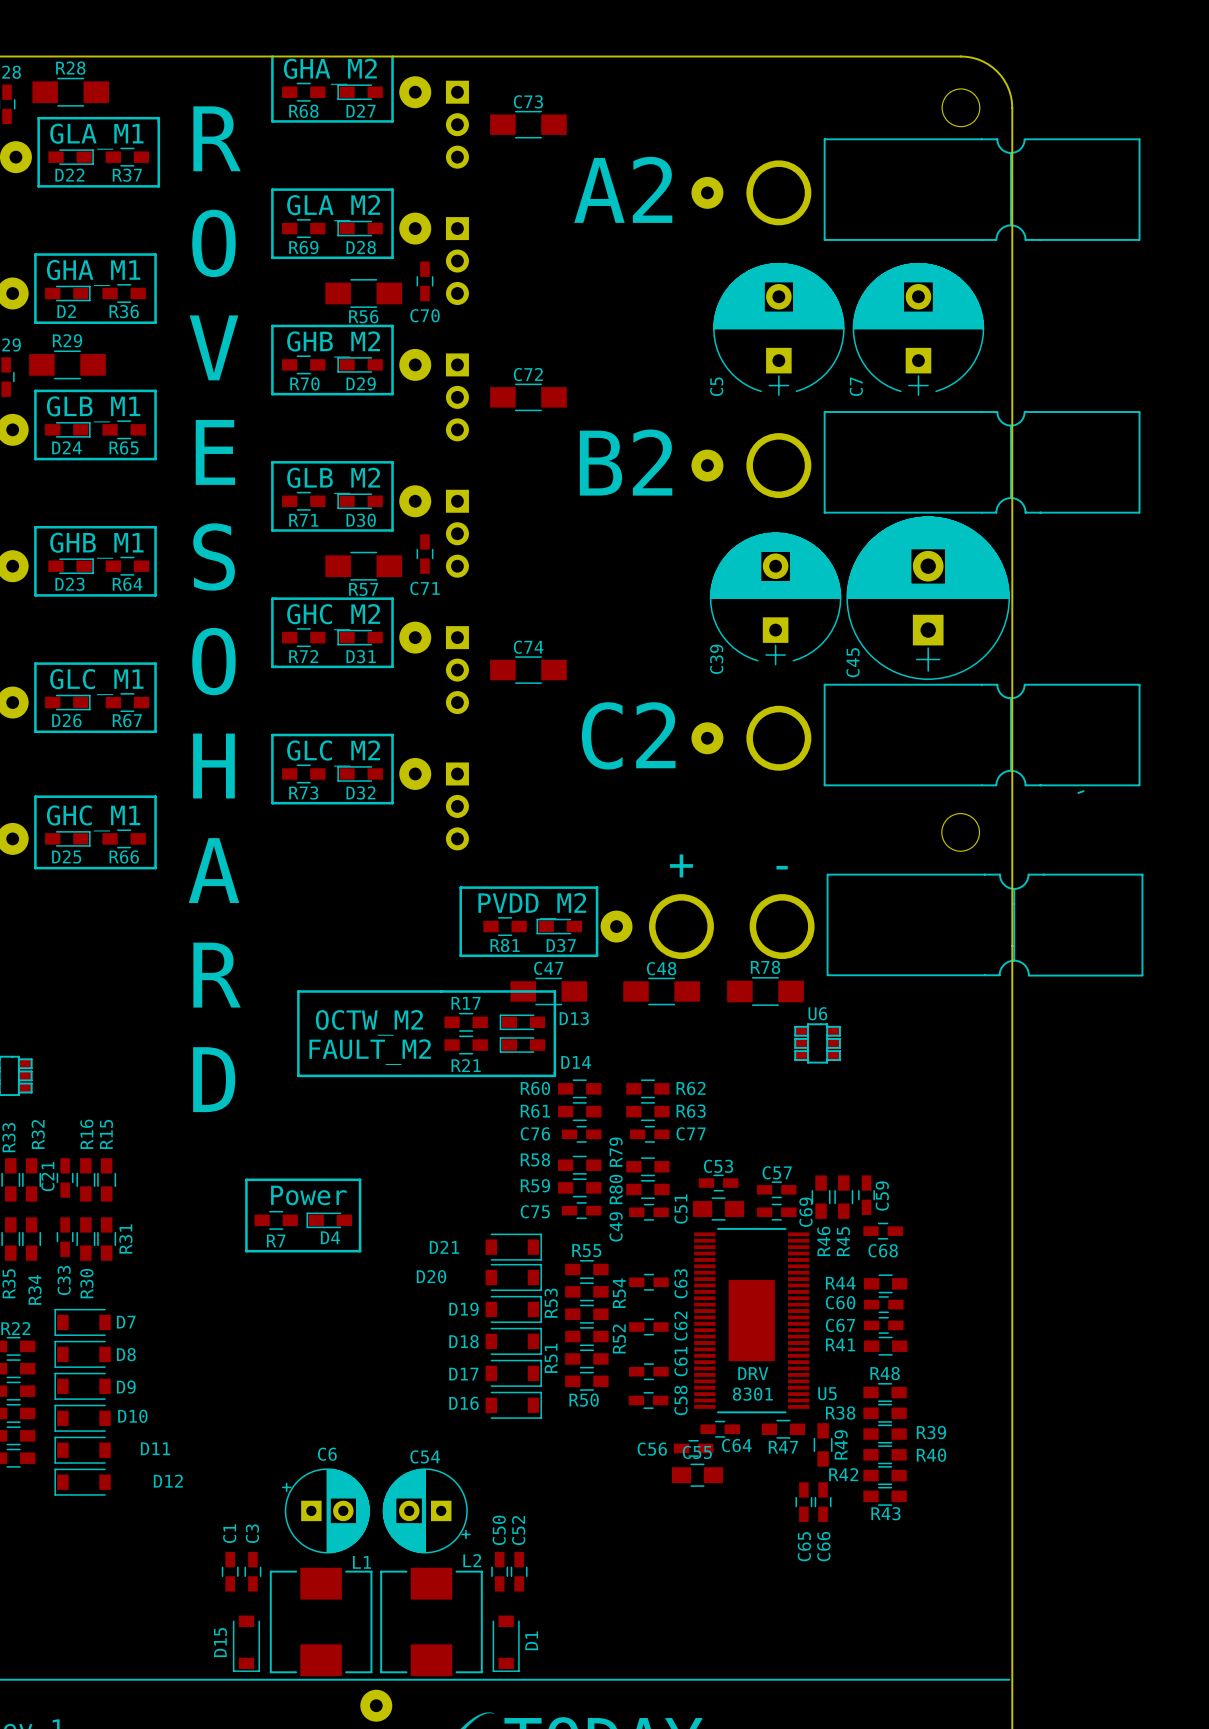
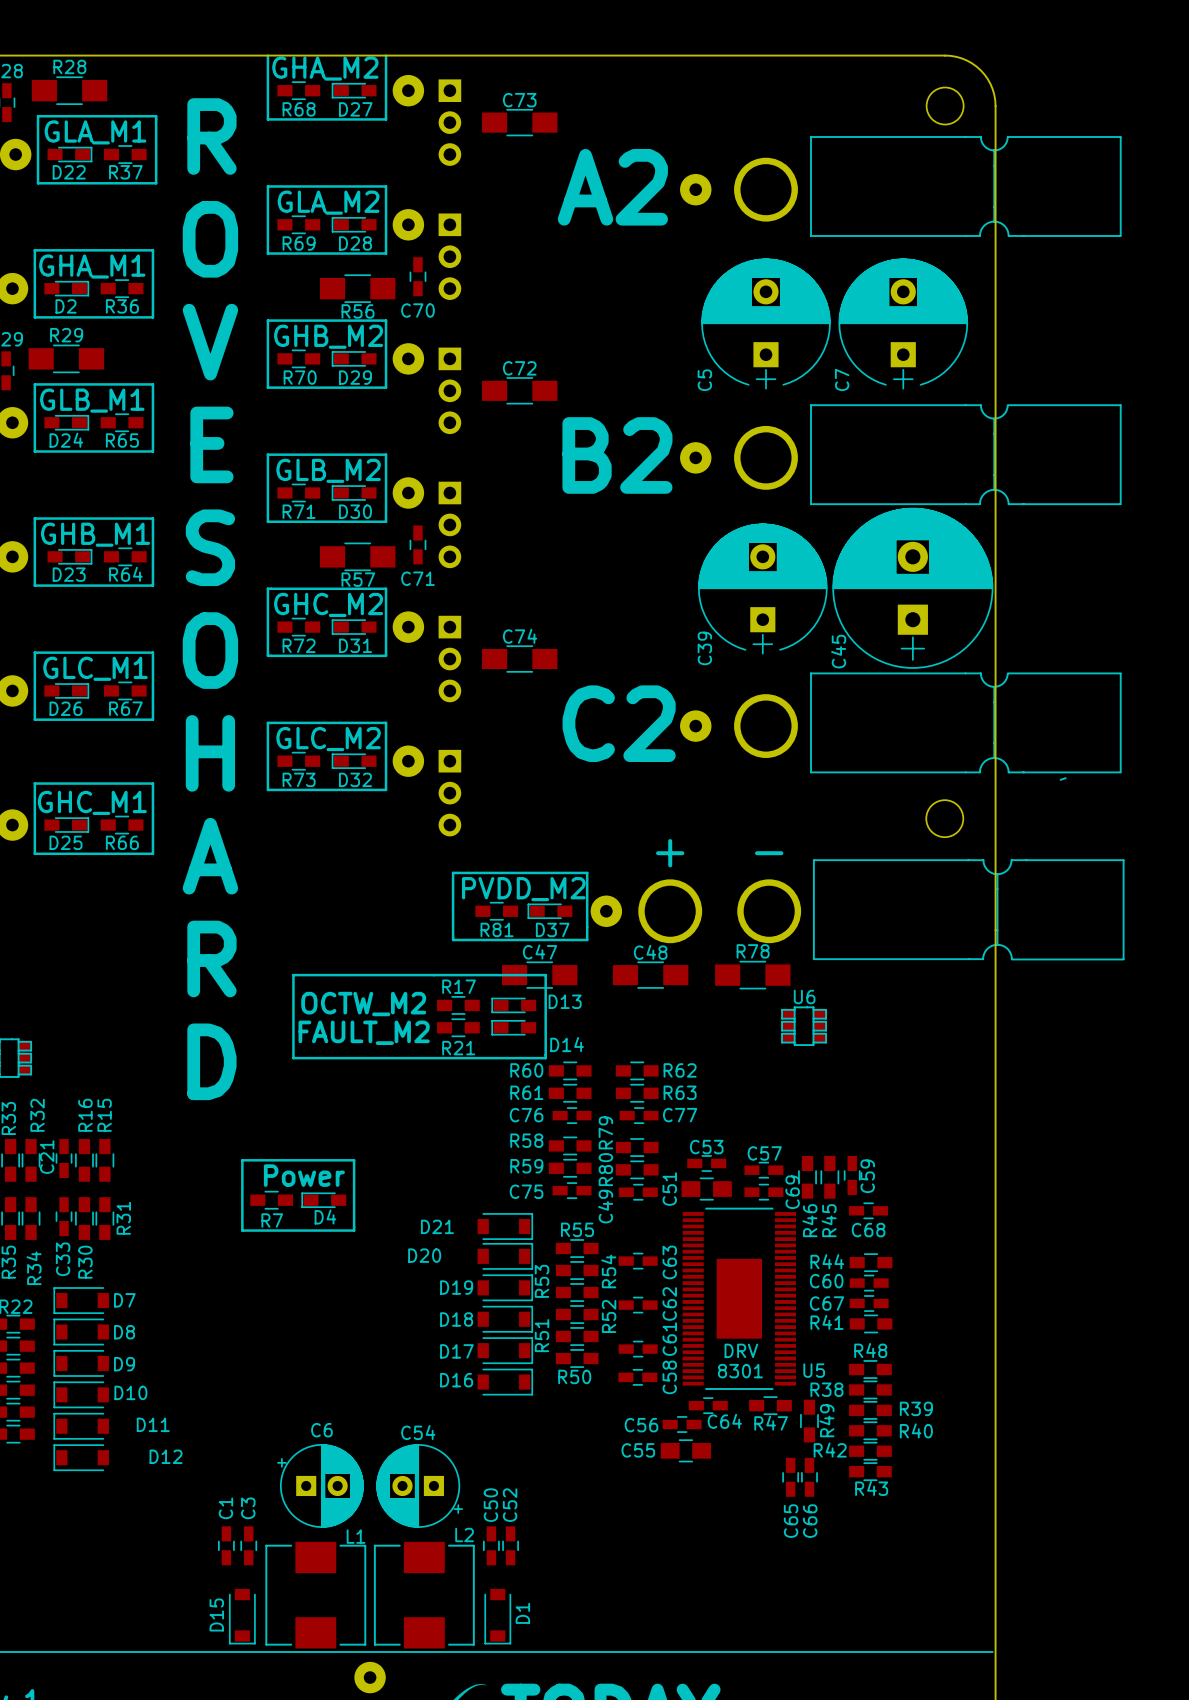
C55 name position: C55 (697, 1452) -> C55 (638, 1450)

